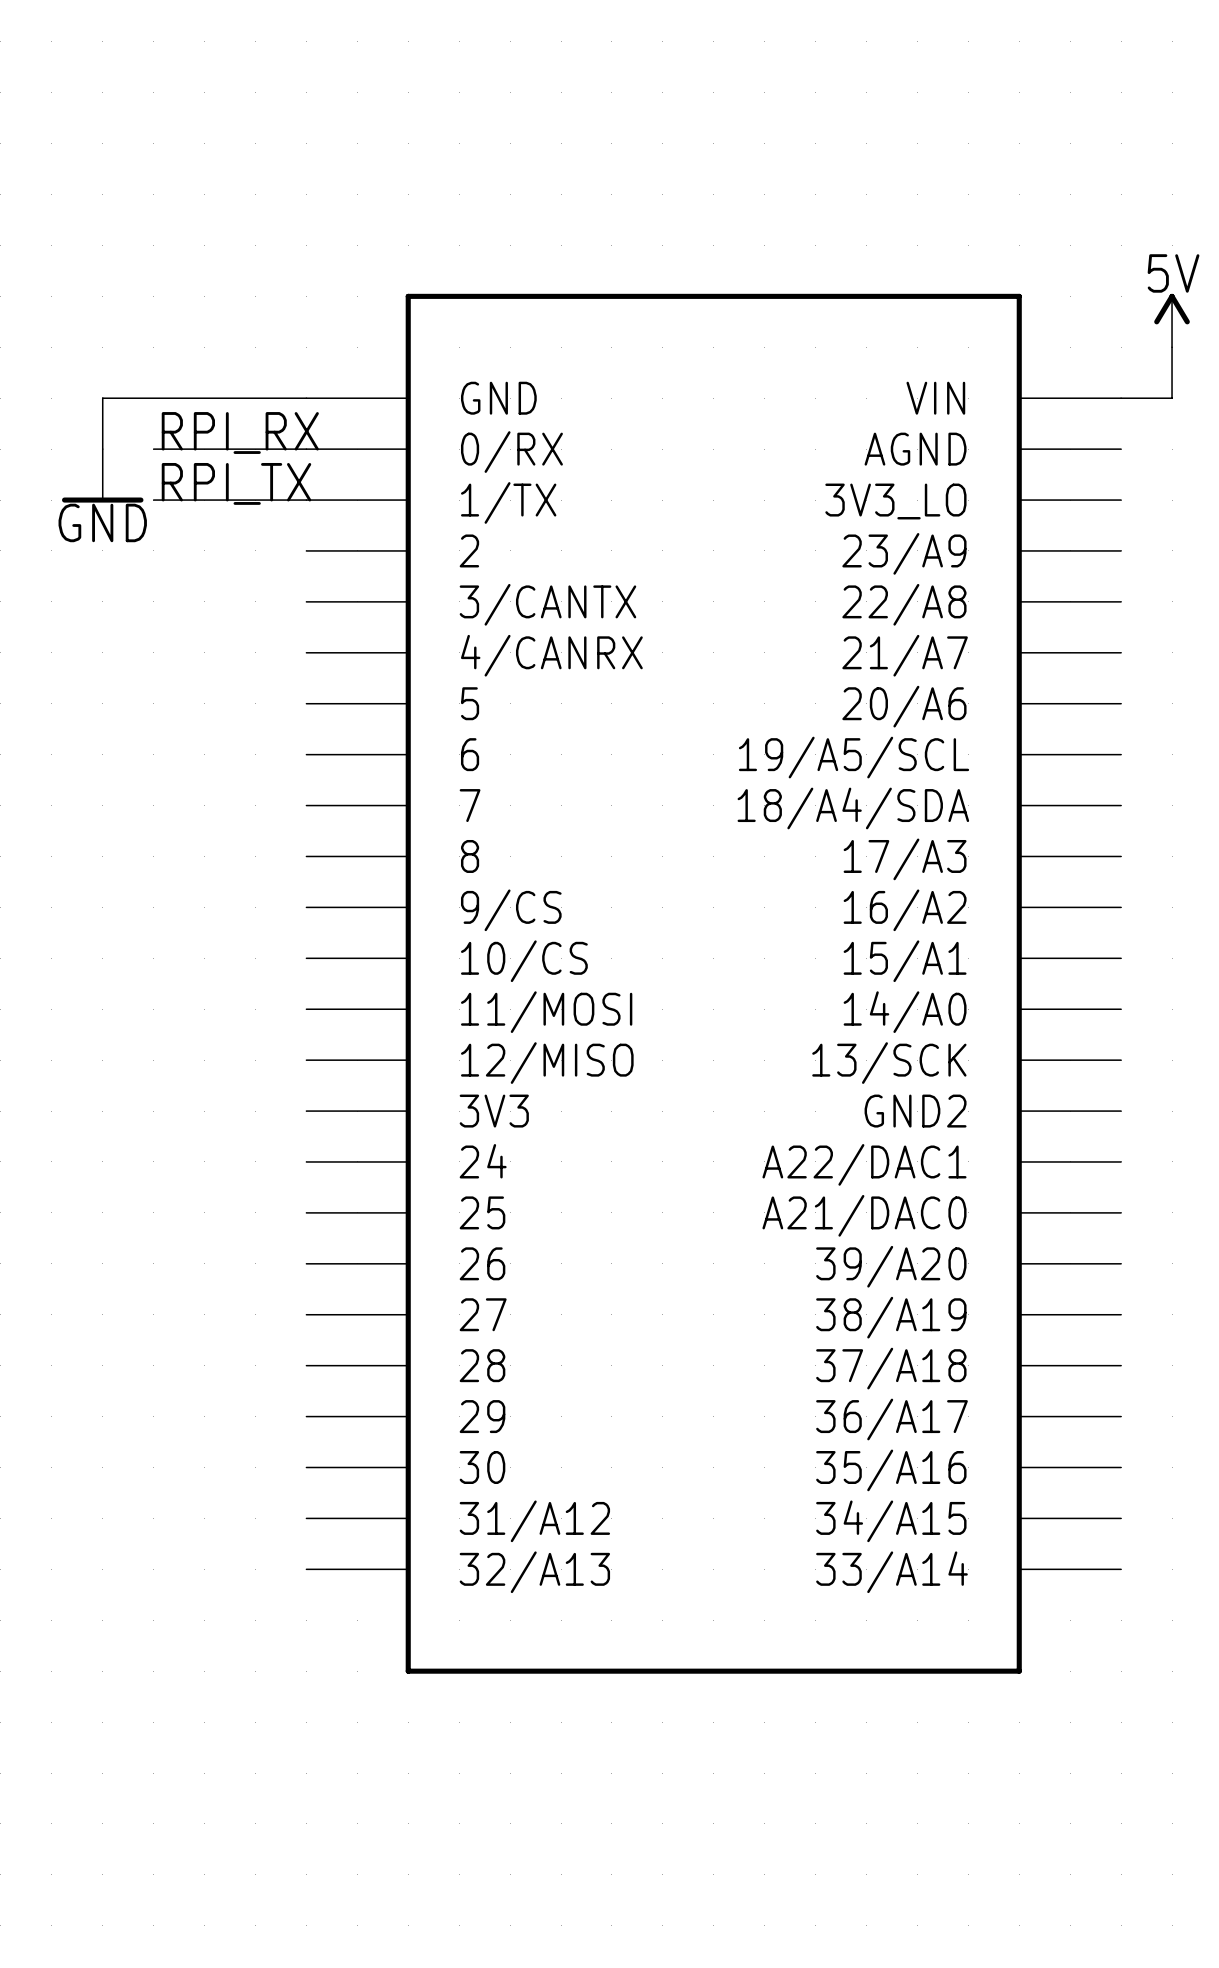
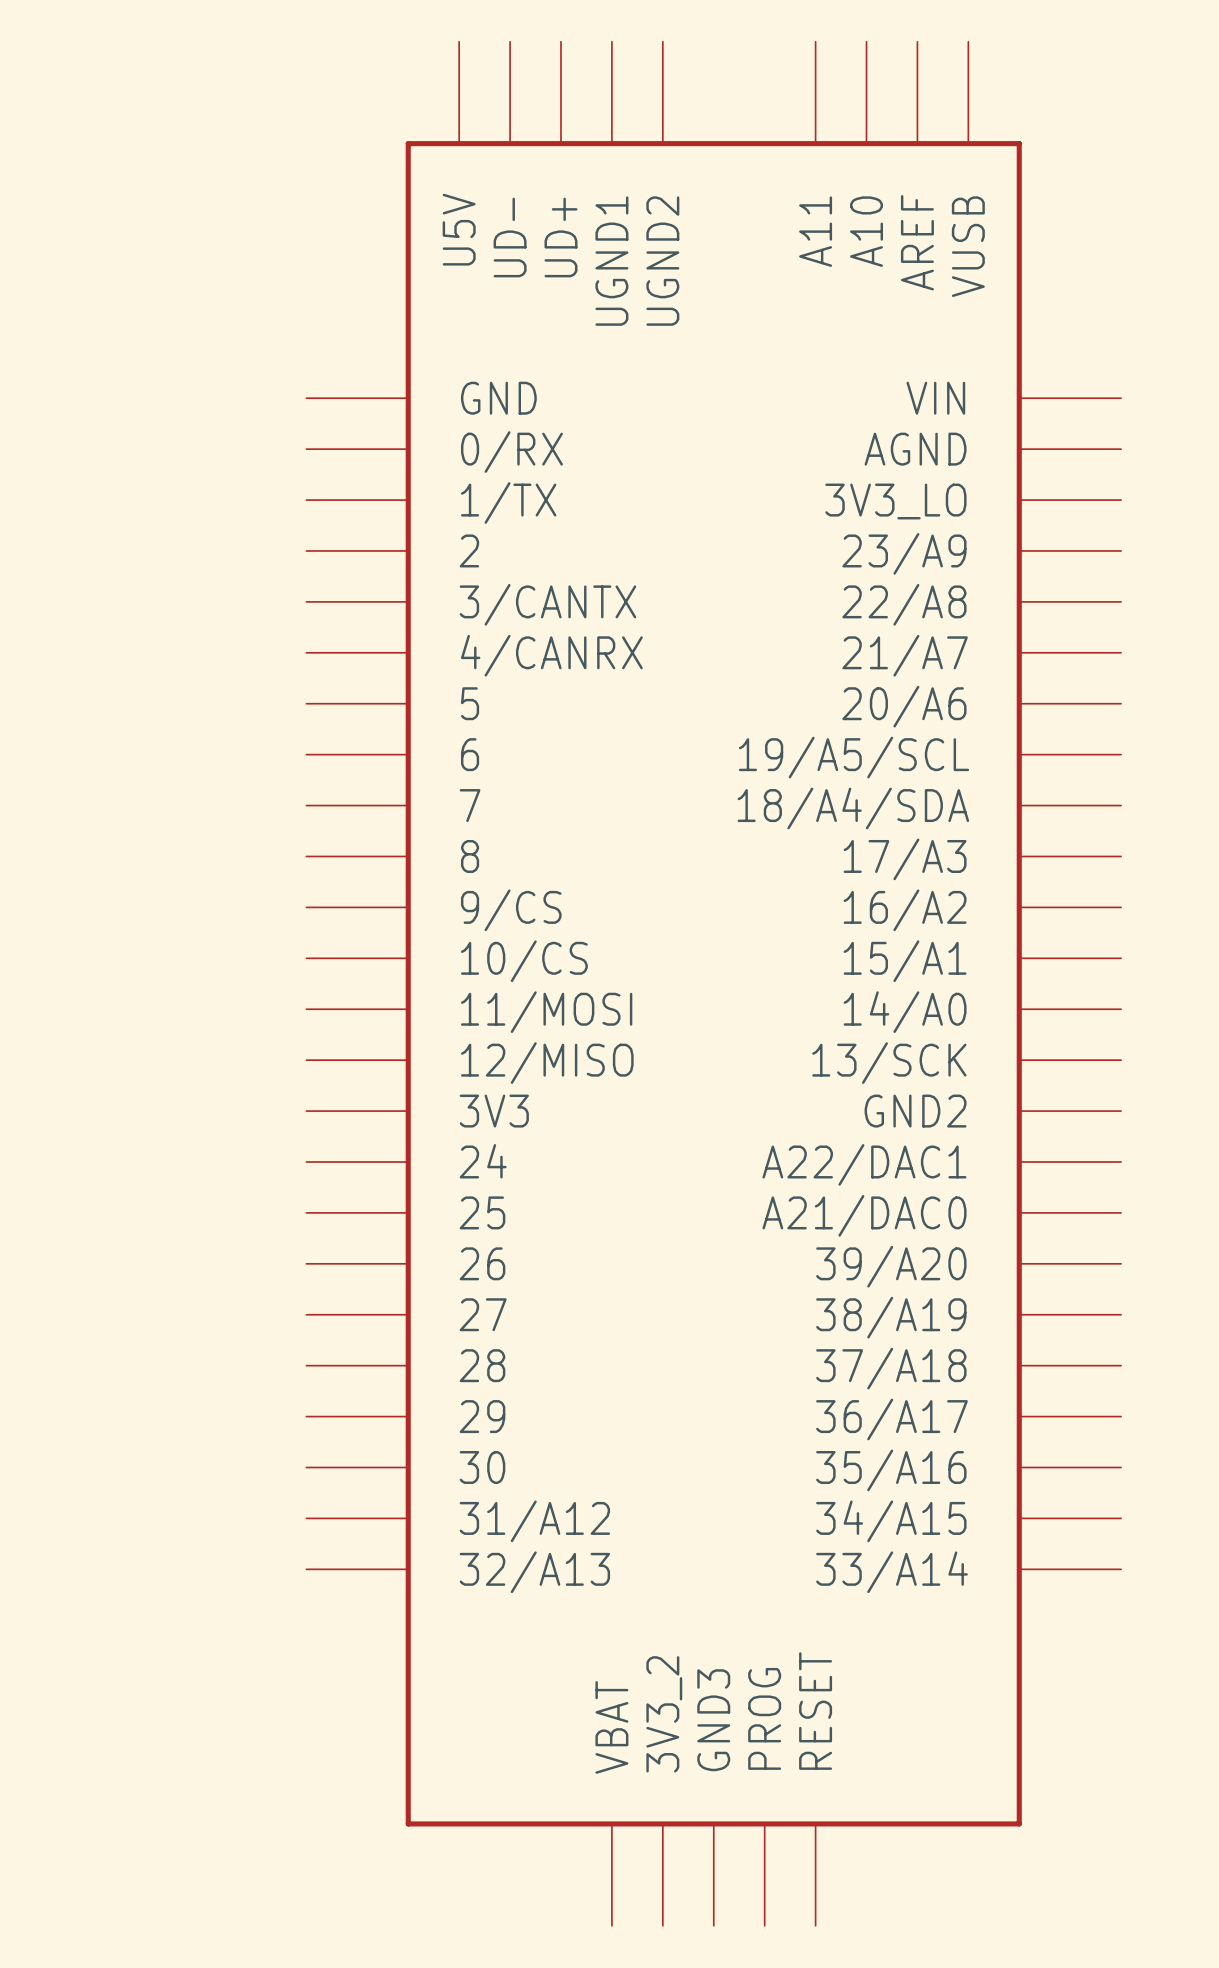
part symbol: [306, 293, 1122, 1674] -> [306, 41, 1122, 1926]
power symbol: 5V (1172, 320) -> none
wire: (1172, 347) (1172, 398) (1121, 398) -> none
wire: (306, 398) (102, 398) (102, 449) -> none
label: RPI_RX (240, 433) -> none
wire: (153, 449) (306, 449) -> none
power symbol: GND (102, 475) -> none
label: RPI_TX (236, 483) -> none
wire: (153, 500) (306, 500) -> none

